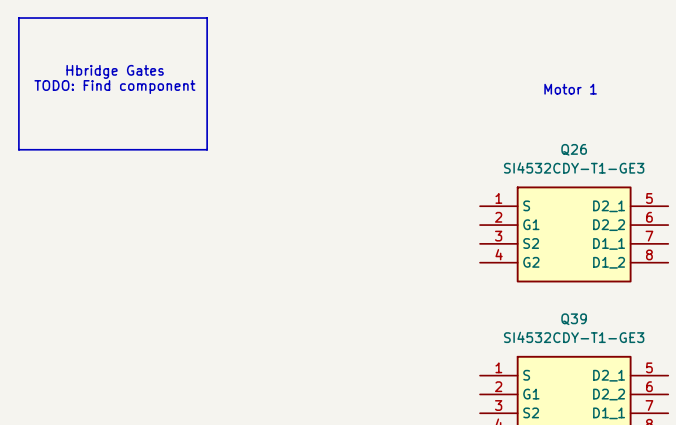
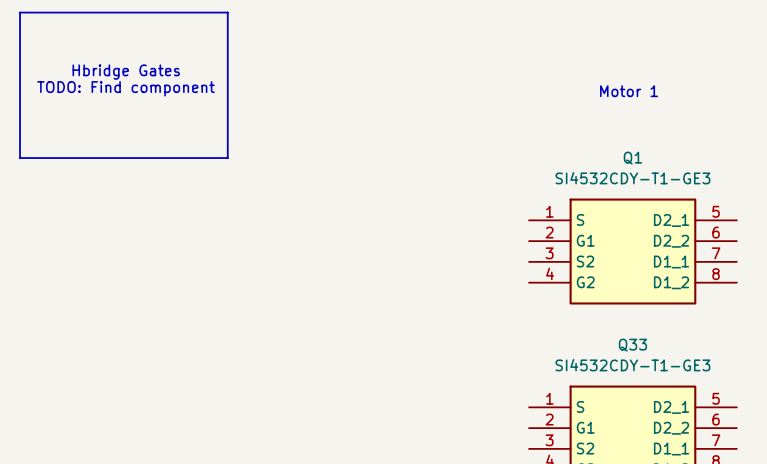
Q26 name: Q26 (574, 149) -> Q1 (632, 158)
Q39 name: Q39 (574, 319) -> Q33 (632, 345)

